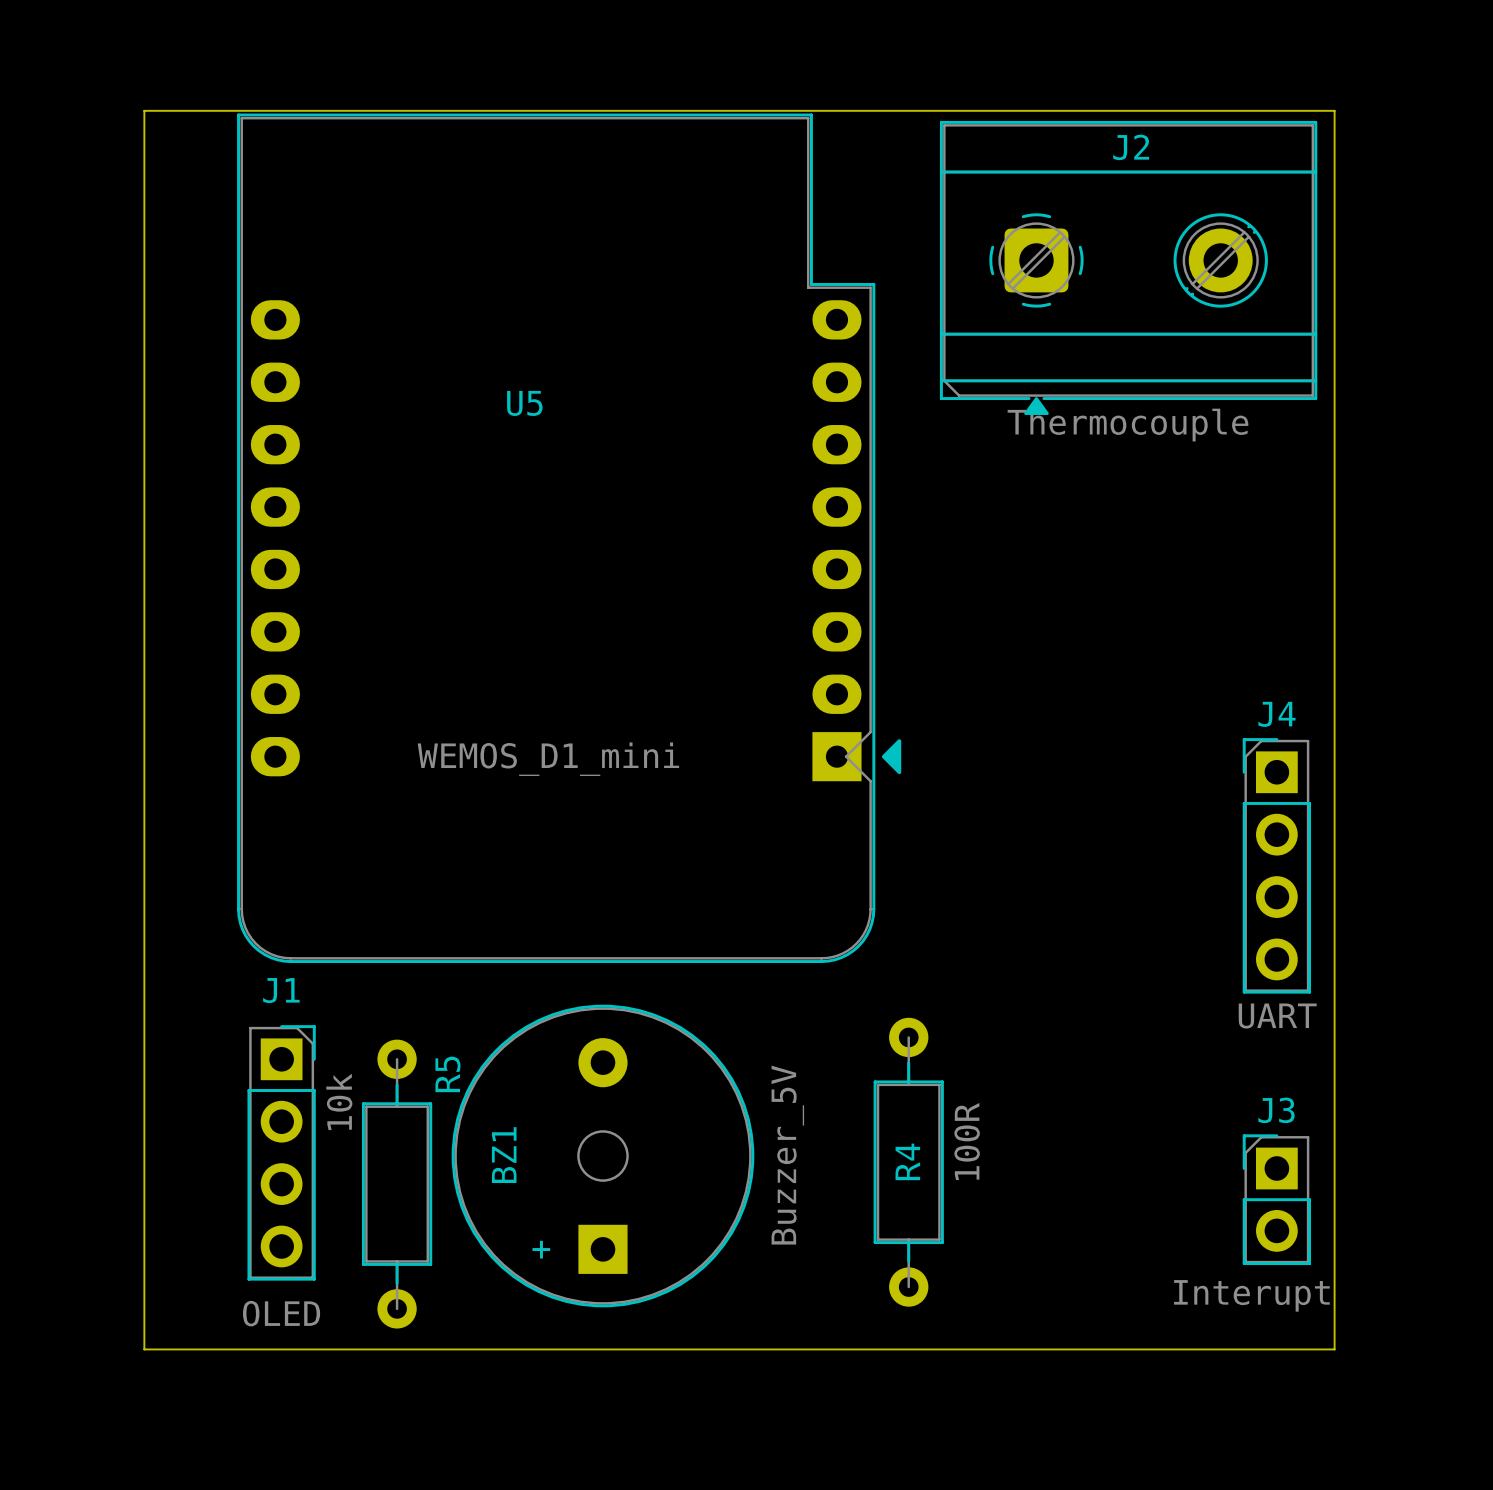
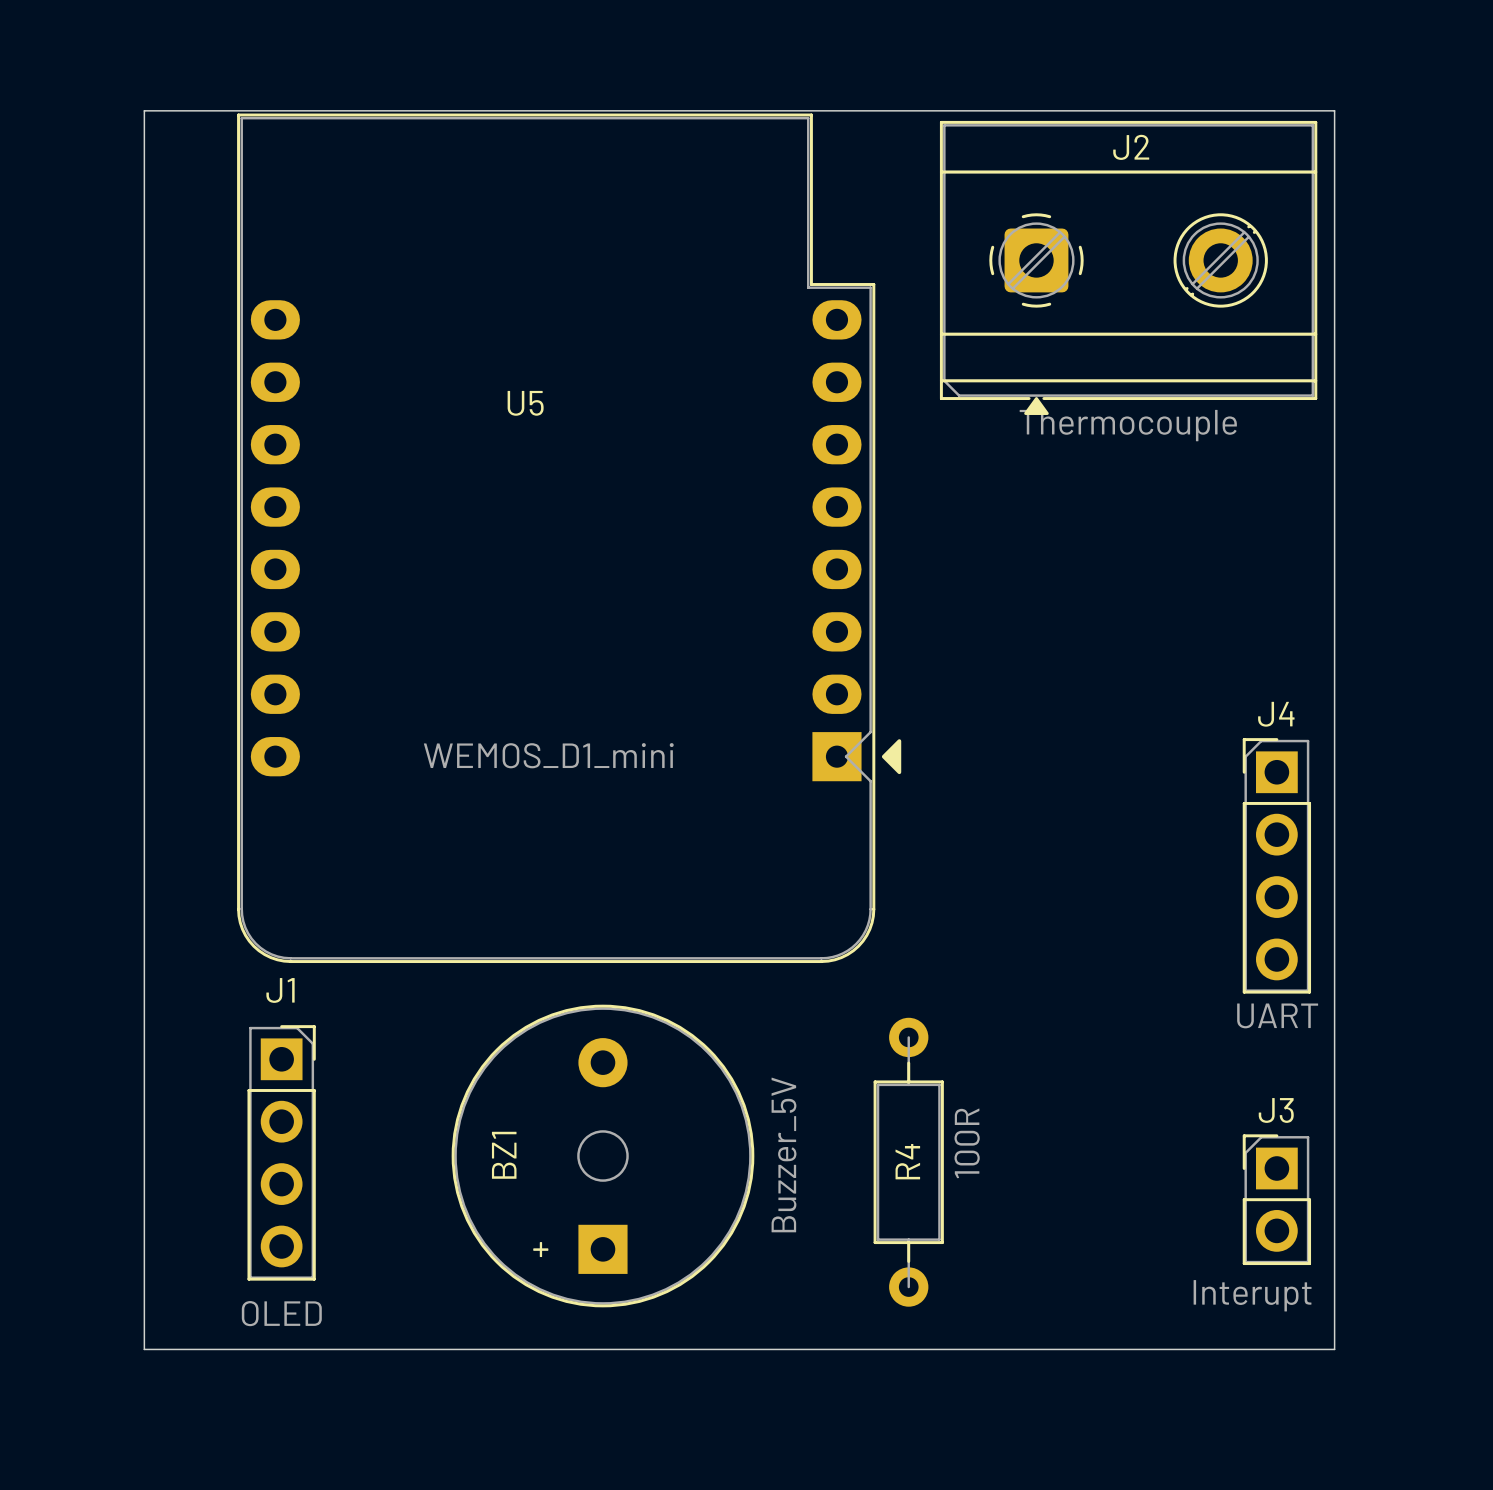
R5: 10k (397, 1184) -> none

